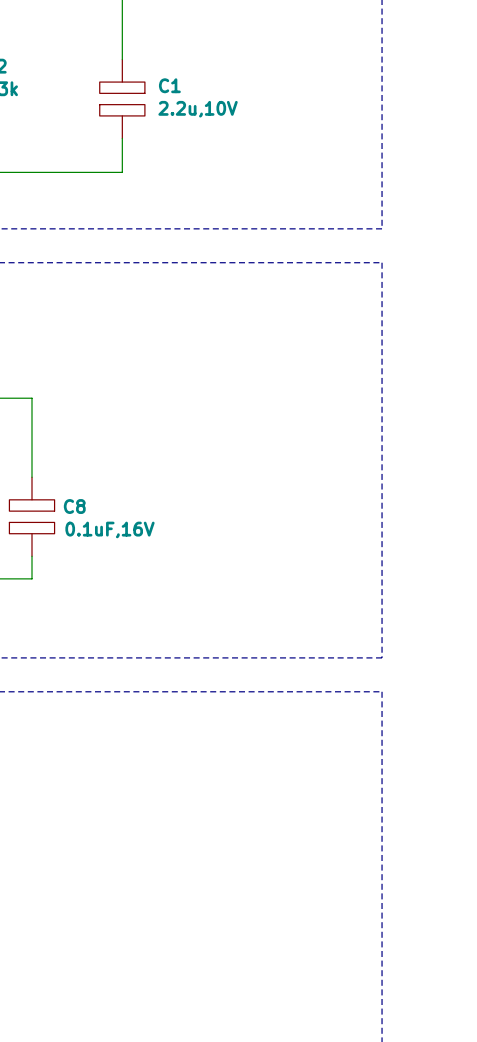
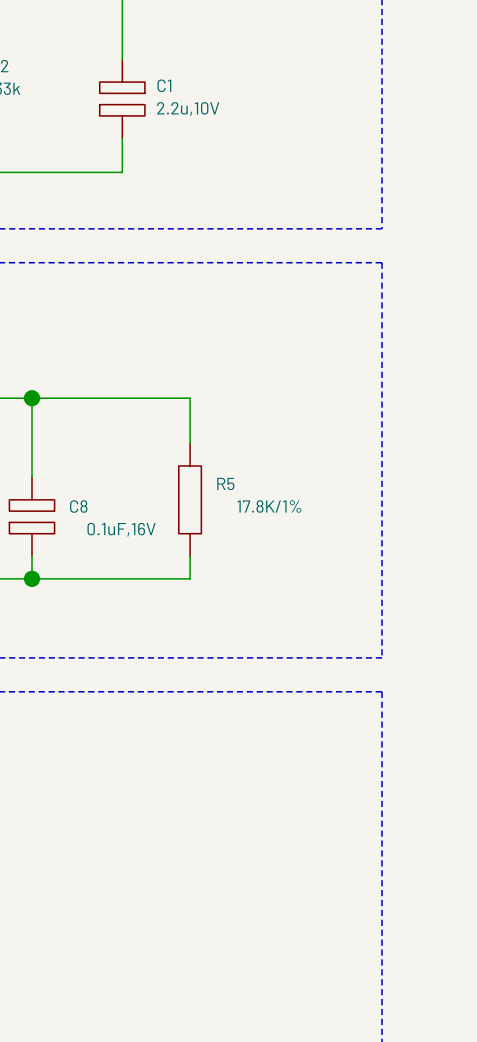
wire: none -> (32, 398) (190, 398) (190, 443)
junction: none -> (32, 398)
R5: none -> 17.8K/1% (190, 499)
wire: none -> (190, 556) (190, 578) (32, 578)
junction: none -> (32, 578)

